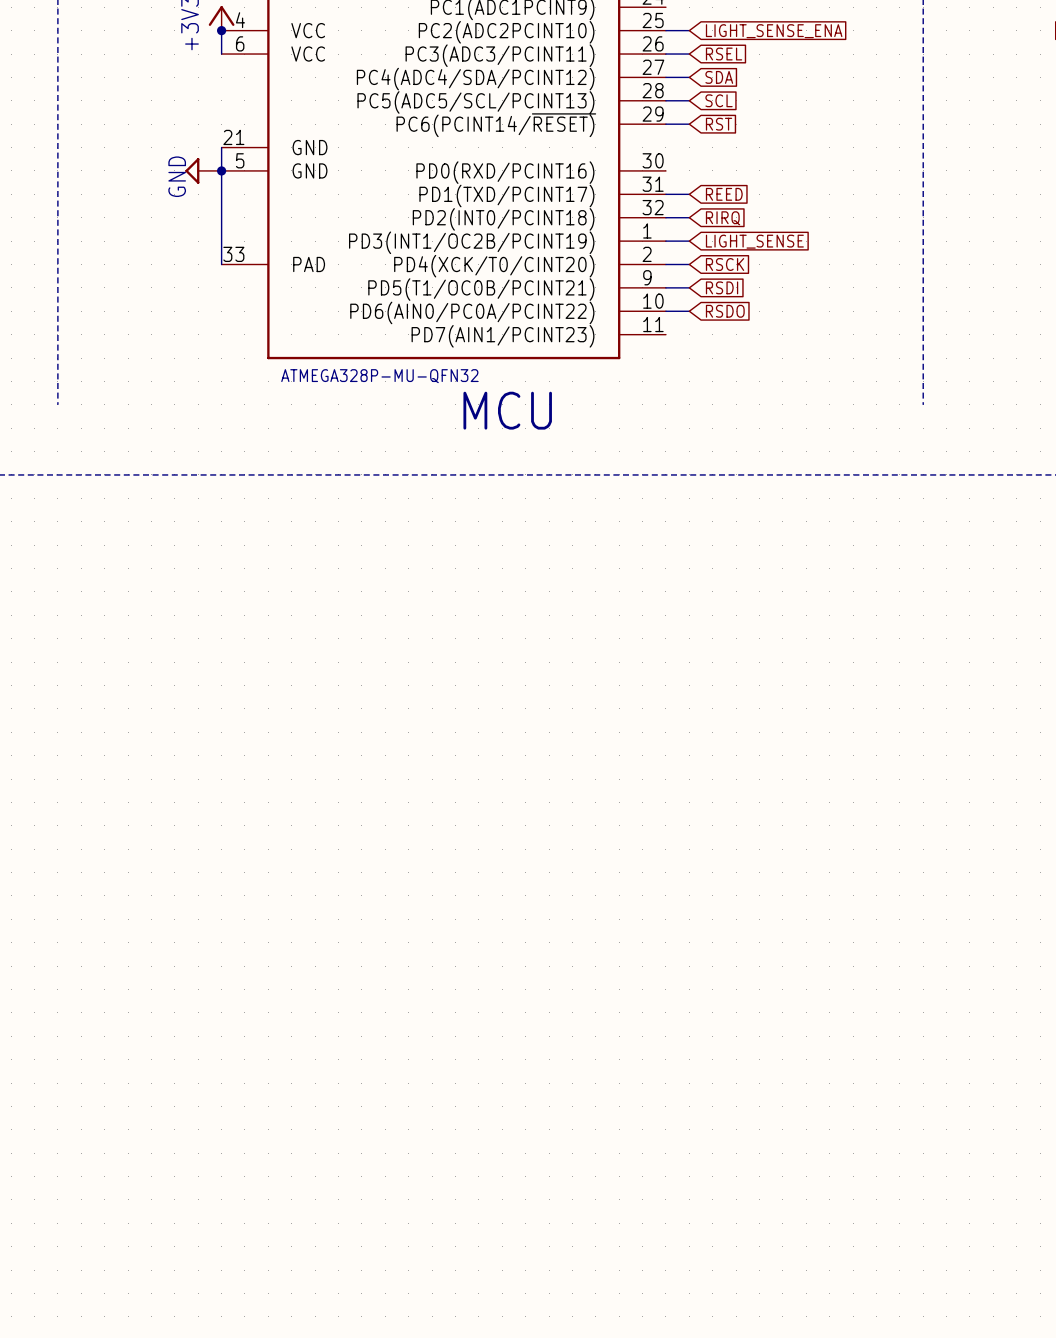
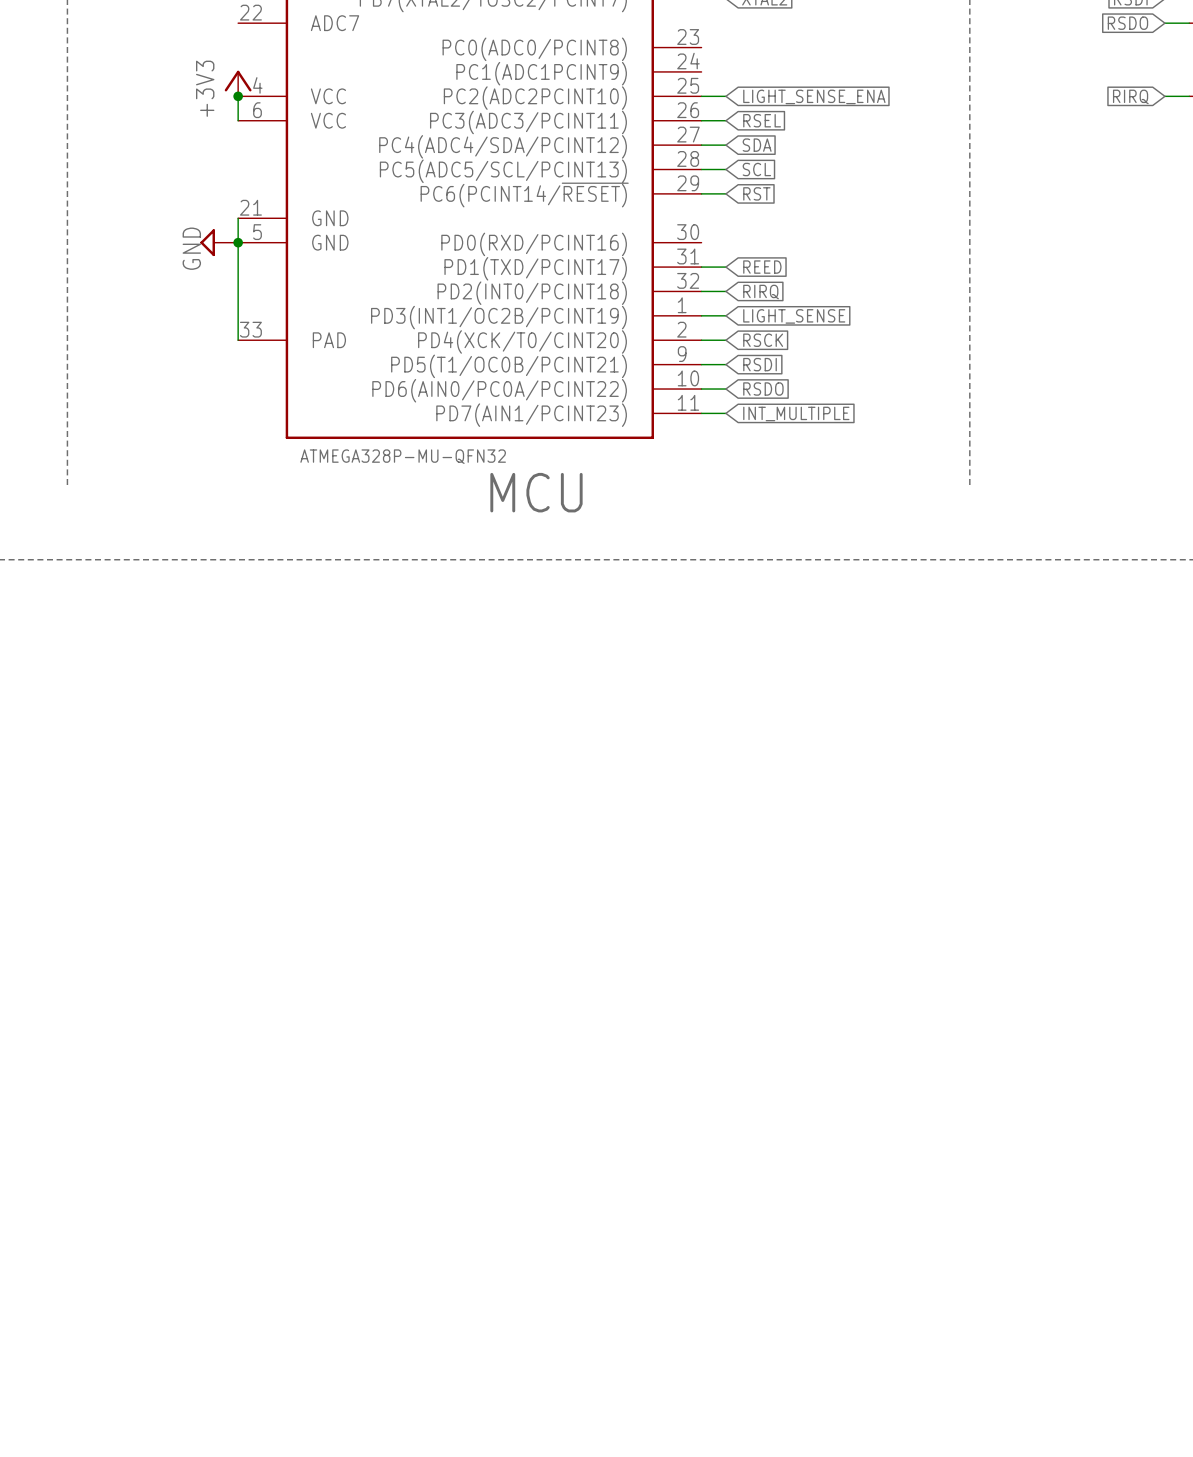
wire: none -> (701, 413) (725, 413)
global label: none -> INT_MULTIPLE (796, 413)

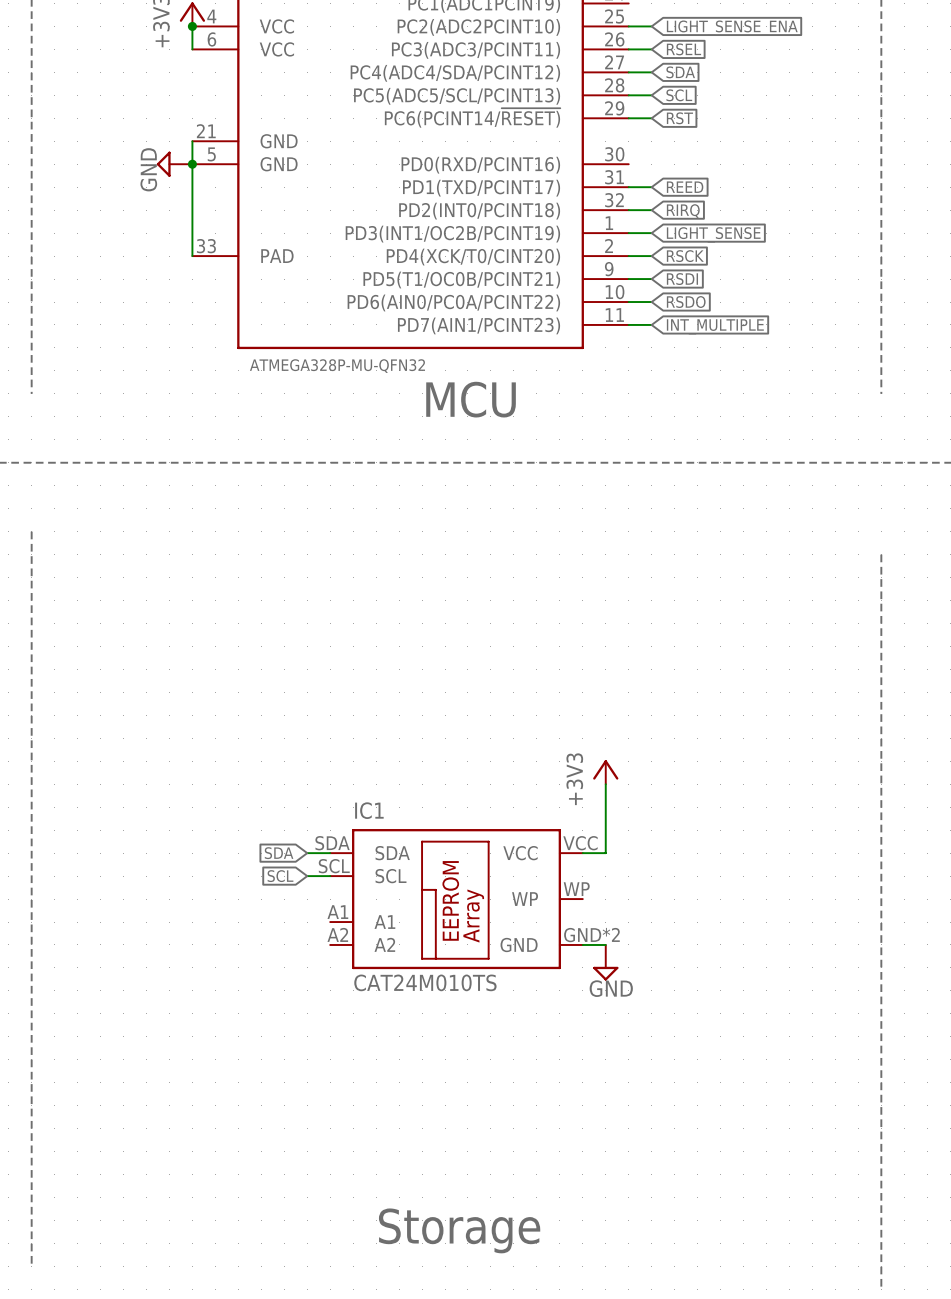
line: none -> (31, 531) (31, 1266)
line: none -> (881, 554) (881, 1289)
power symbol: none -> +3V3 (605, 772)
wire: none -> (605, 784) (605, 853) (582, 853)
global label: none -> SDA (279, 853)
wire: none -> (307, 853) (330, 853)
global label: none -> SCL (280, 876)
wire: none -> (307, 876) (330, 876)
IC1: none -> CAT24M010TS (456, 899)
wire: none -> (582, 944) (605, 944)
power symbol: none -> GND (605, 962)
text: none -> Storage (459, 1230)

